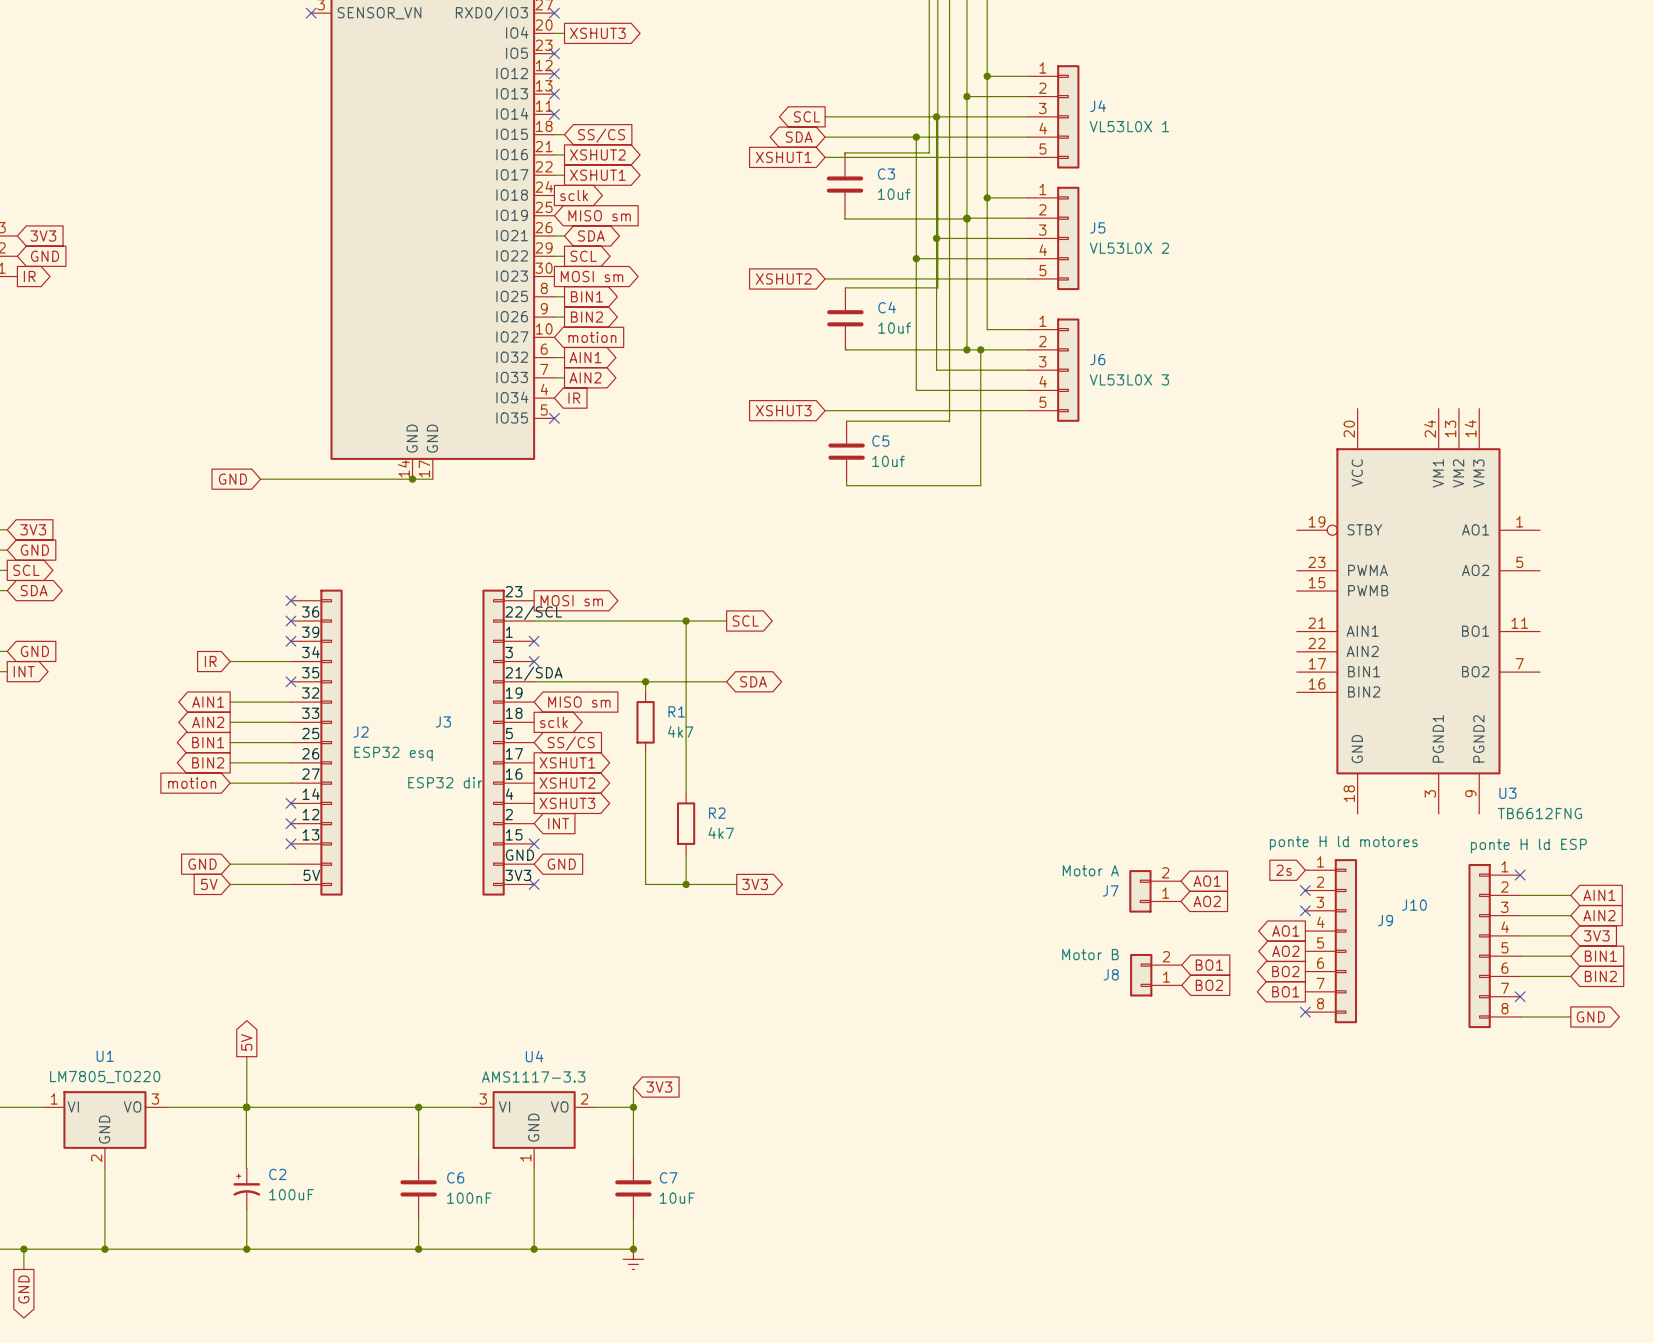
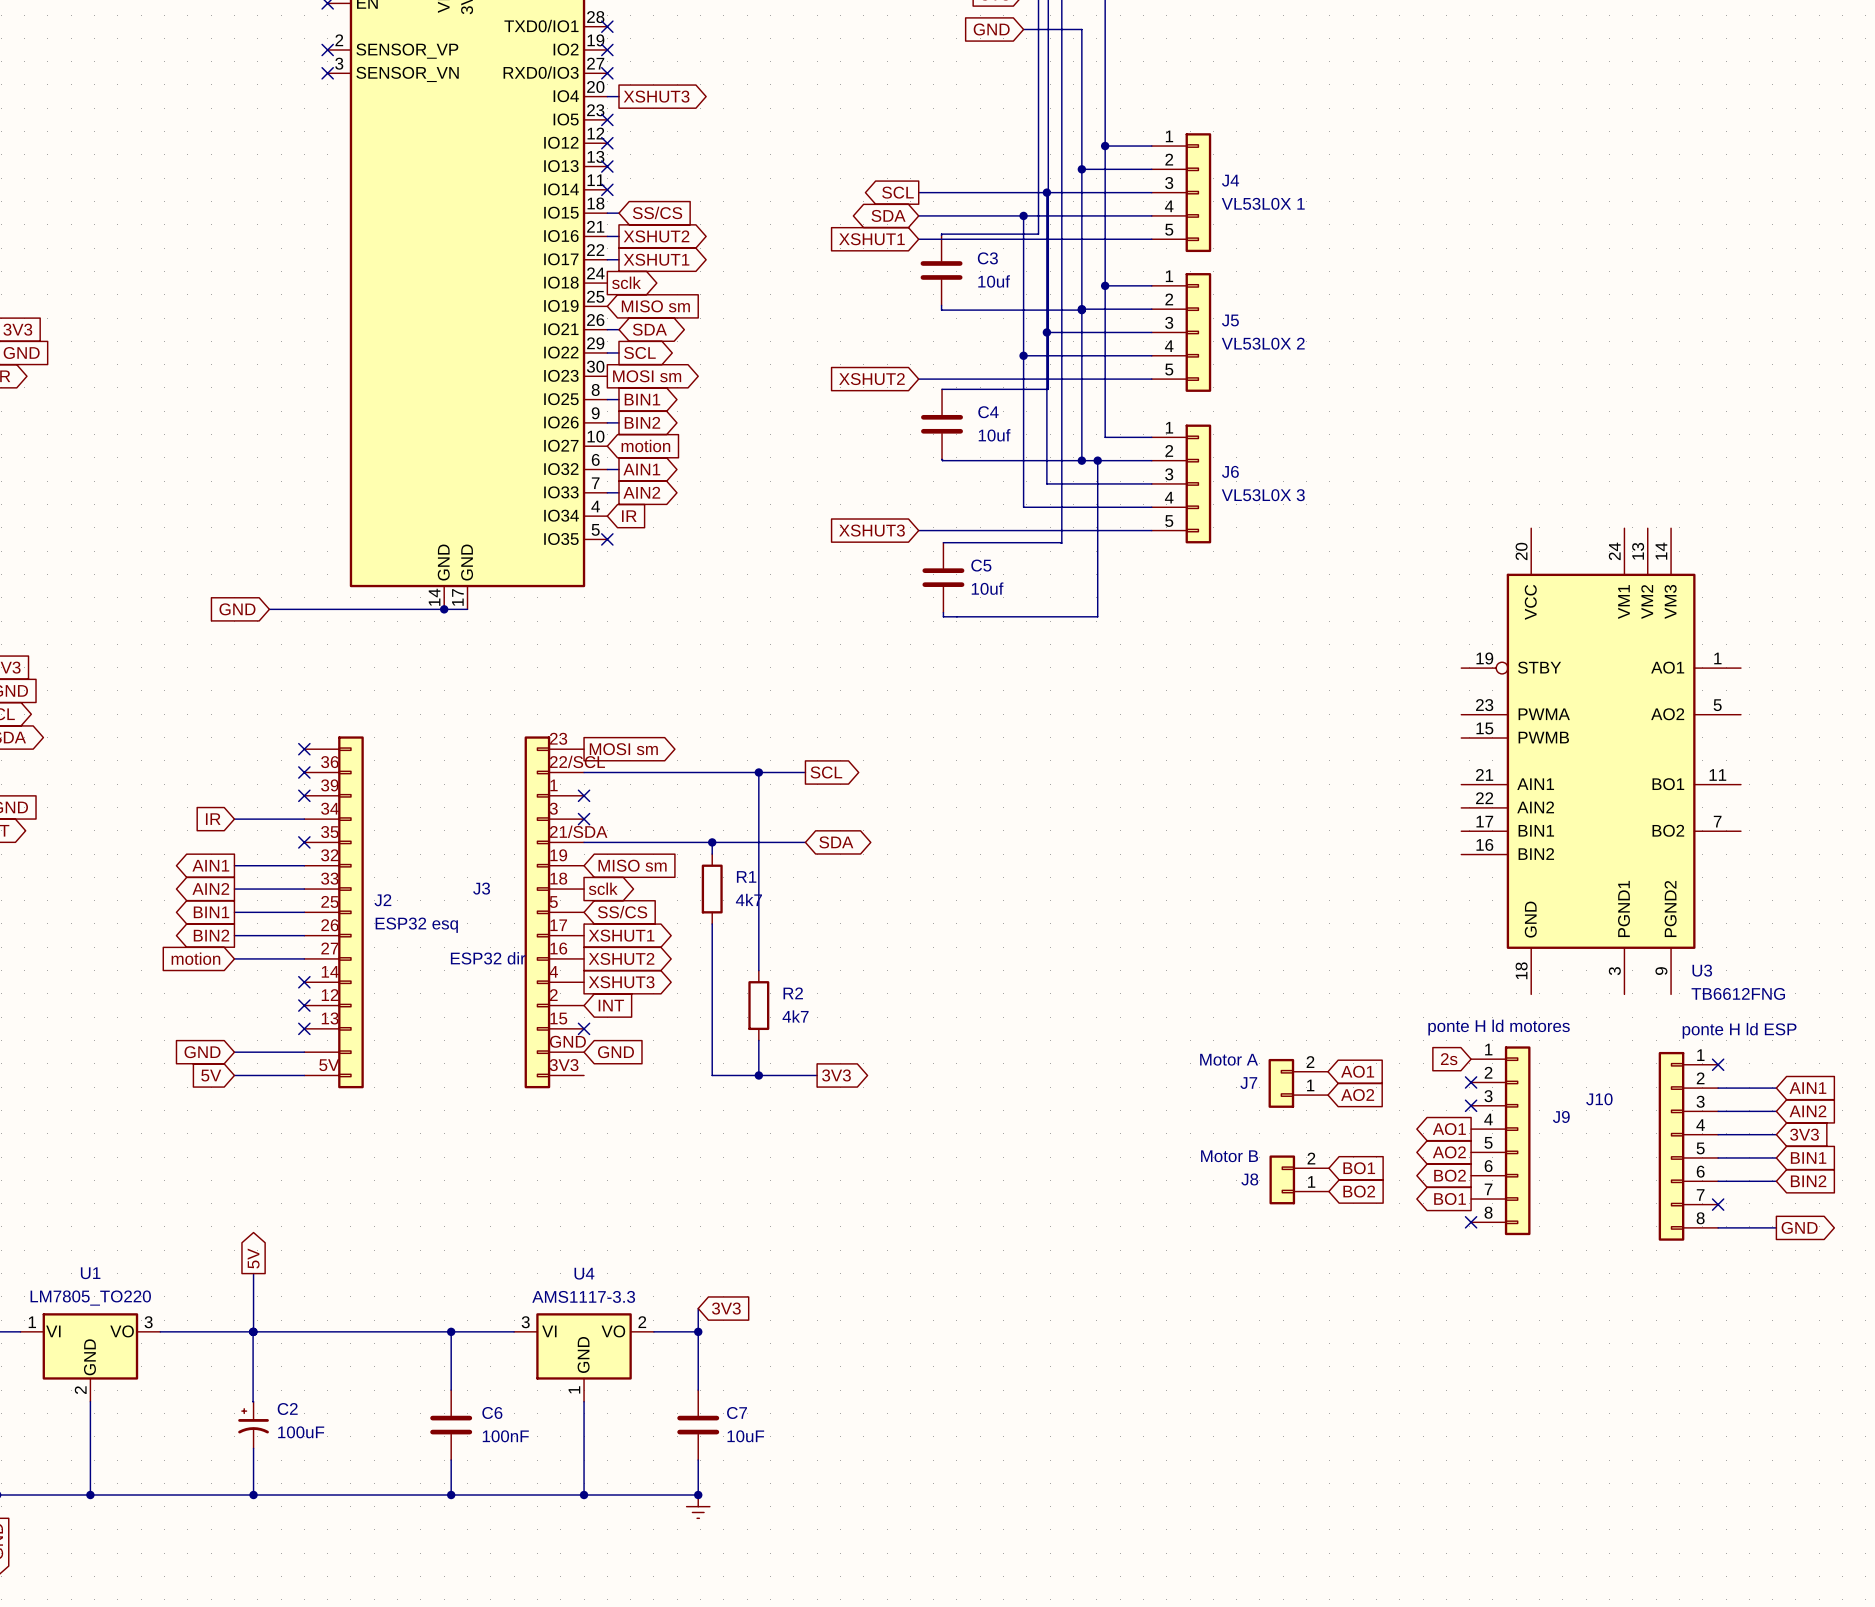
no-connect mark: (534, 884) -> none

